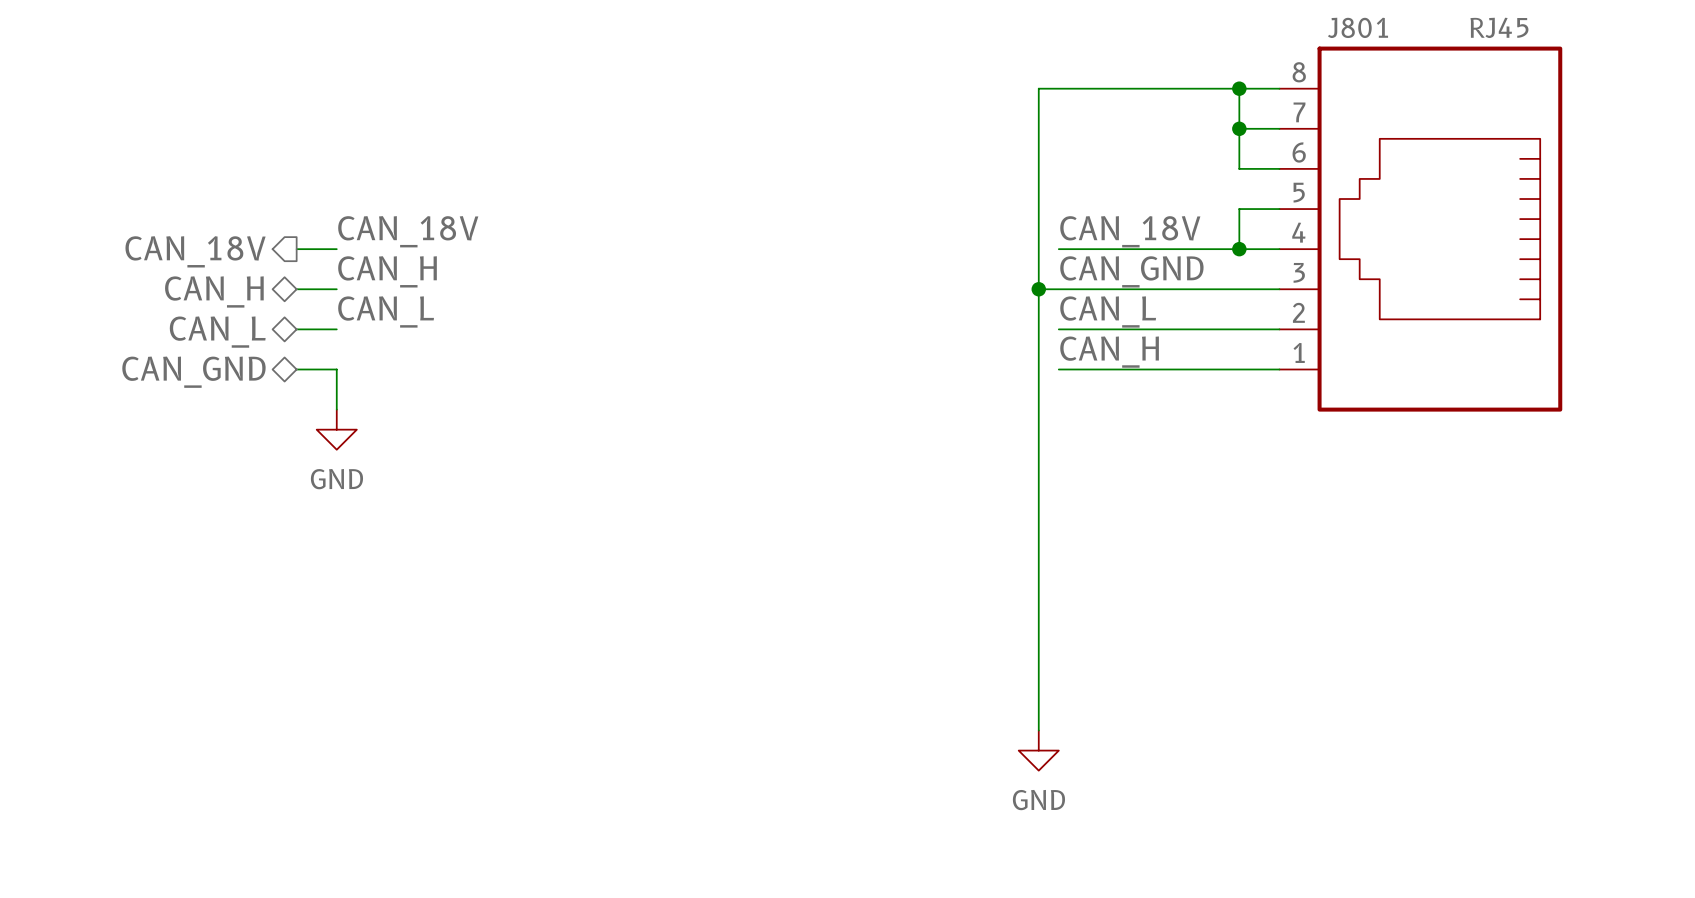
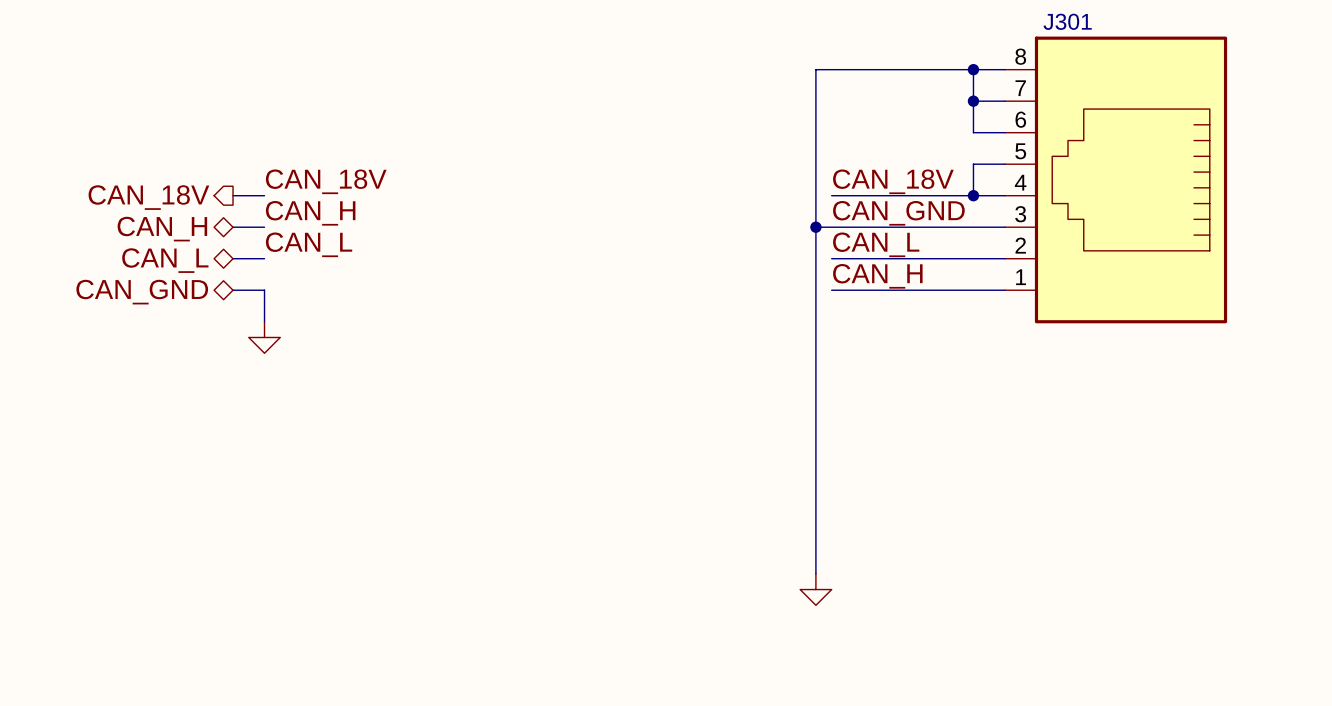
J801 name: J801 (1358, 27) -> J301 (1067, 21)
J801 value: RJ45 (1499, 27) -> none
power symbol text: GND (336, 479) -> none
power symbol text: GND (1038, 800) -> none

